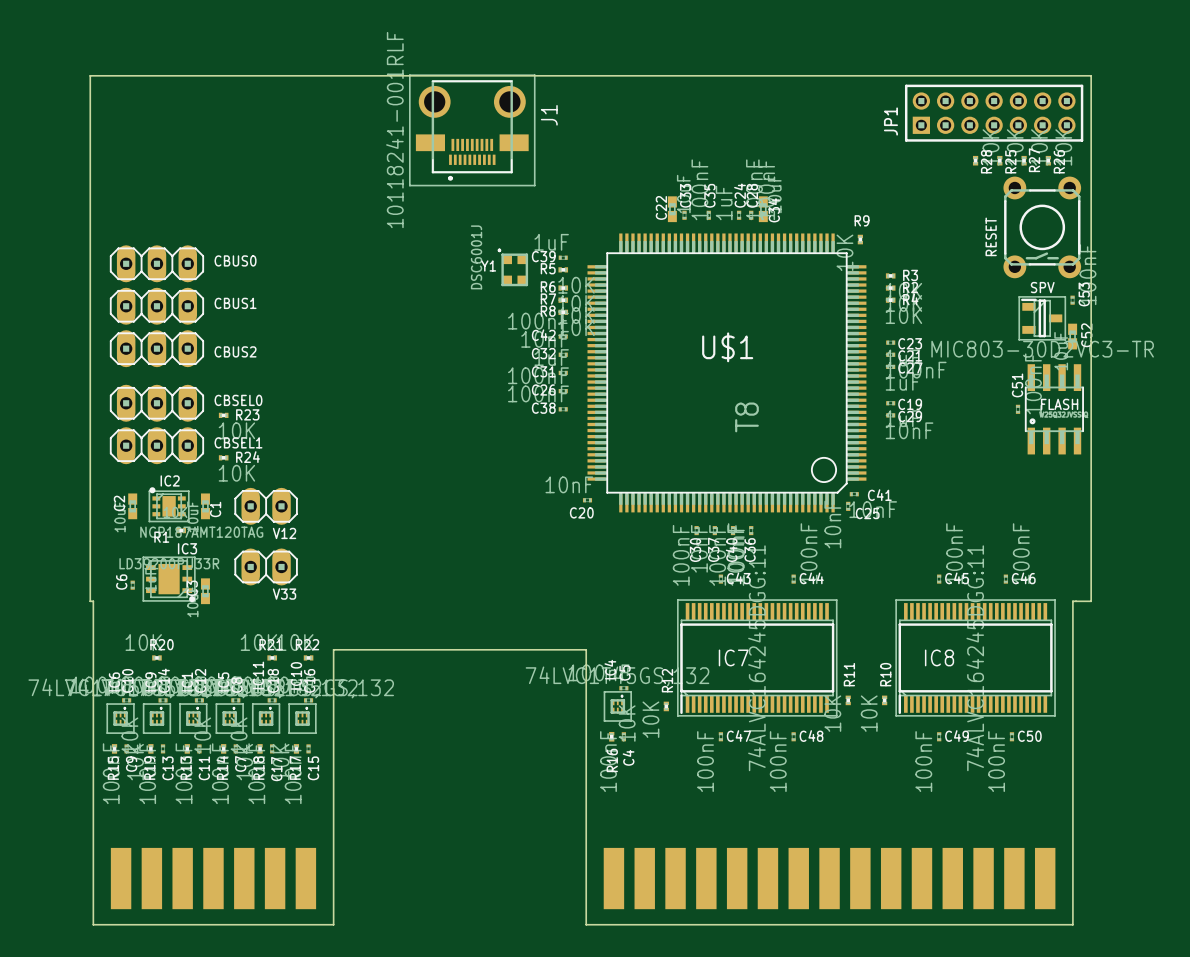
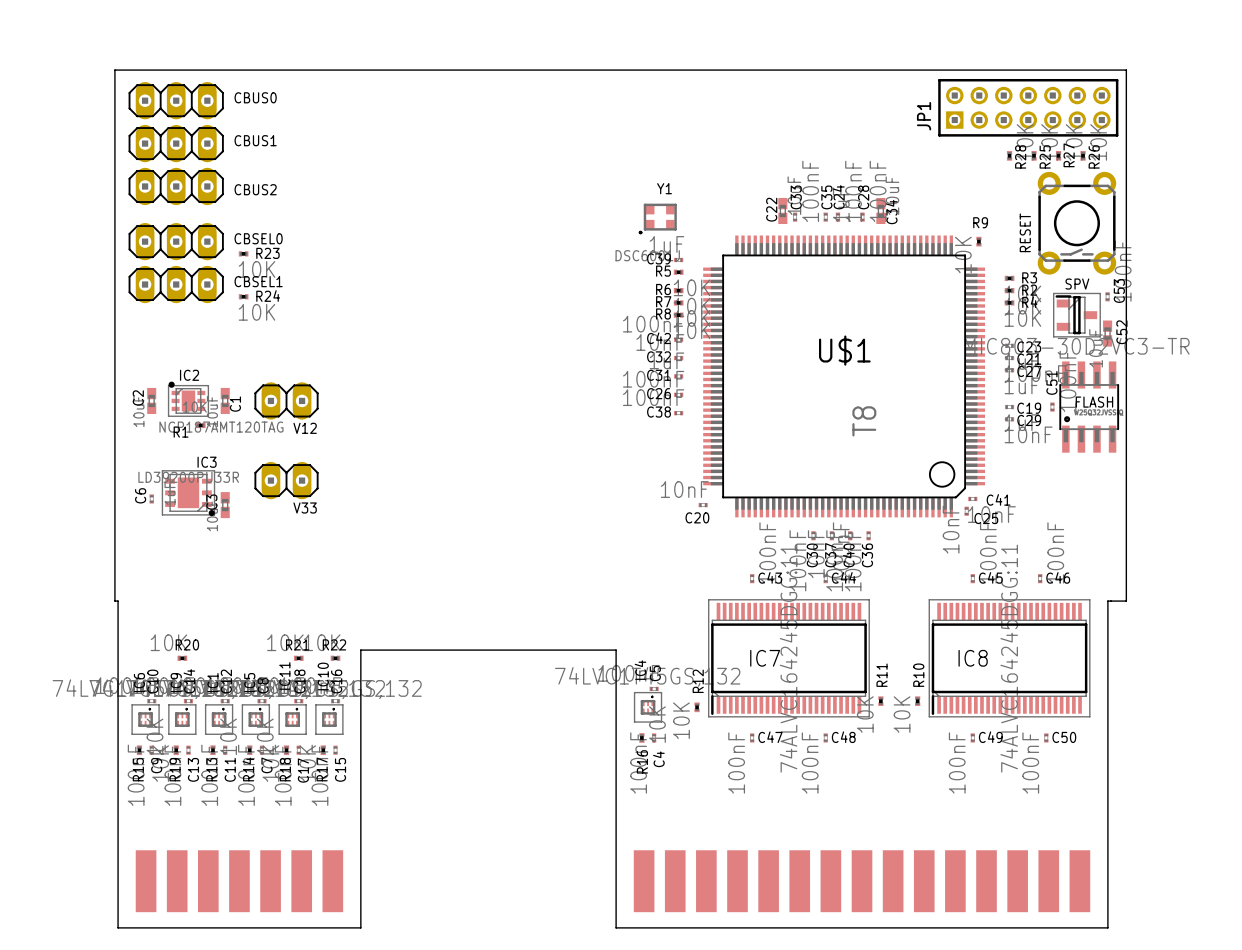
J1: 10118241-001RLF (472, 130) -> none
C22 position: (672, 209) -> (782, 210)
C34 position: (763, 209) -> (880, 210)
C33 position: (684, 215) -> (795, 217)
C35 position: (708, 215) -> (825, 217)
C24 position: (739, 215) -> (837, 217)
C28 position: (751, 215) -> (862, 217)
R9 position: (860, 239) -> (978, 241)
C39 position: (563, 257) -> (678, 260)
CBUS0 position: (156, 263) -> (176, 100)
Y1 name position: Y1 (488, 265) -> Y1 (664, 188)
Y1 rotation: 0° (512, 267) -> 90° counterclockwise (657, 219)
Y1 position: (512, 267) -> (657, 219)
R5 position: (563, 269) -> (678, 272)
R3 position: (890, 275) -> (1009, 278)
R6 position: (563, 288) -> (678, 290)
R2 position: (890, 288) -> (1009, 290)
R7 position: (563, 300) -> (678, 302)
R4 position: (890, 300) -> (1009, 302)
CBUS1 position: (156, 306) -> (176, 143)
R8 position: (563, 312) -> (678, 315)
C42 position: (563, 336) -> (678, 339)
C23 position: (890, 342) -> (1009, 345)
CBUS2 position: (156, 348) -> (176, 186)
C32 position: (563, 354) -> (678, 358)
C21 position: (890, 354) -> (1009, 358)
C27 position: (890, 366) -> (1009, 370)
C31 position: (563, 372) -> (678, 376)
U$1 position: (726, 372) -> (844, 376)
C26 position: (563, 391) -> (678, 394)
CBSEL0 position: (156, 403) -> (176, 241)
C19 position: (890, 403) -> (1009, 407)
C38 position: (563, 409) -> (678, 413)
R23 position: (223, 415) -> (243, 253)
C29 position: (890, 415) -> (1009, 419)
CBSEL1 position: (156, 445) -> (176, 284)
R24 position: (223, 457) -> (243, 296)
C41 position: (854, 494) -> (972, 498)
C20 position: (587, 500) -> (703, 505)
IC2 position: (169, 504) -> (188, 399)
C2 position: (132, 506) -> (151, 400)
C1 position: (205, 506) -> (225, 400)
V12 position: (266, 506) -> (286, 400)
C25 position: (848, 506) -> (966, 511)
R1 position: (181, 530) -> (200, 425)
C30 position: (696, 530) -> (813, 535)
C37 position: (714, 530) -> (831, 535)
C40 position: (733, 530) -> (850, 535)
C36 position: (751, 530) -> (868, 535)
V33 position: (266, 566) -> (286, 480)
IC3 position: (169, 579) -> (188, 493)
C6 position: (132, 585) -> (151, 498)
C3 position: (205, 591) -> (225, 505)

